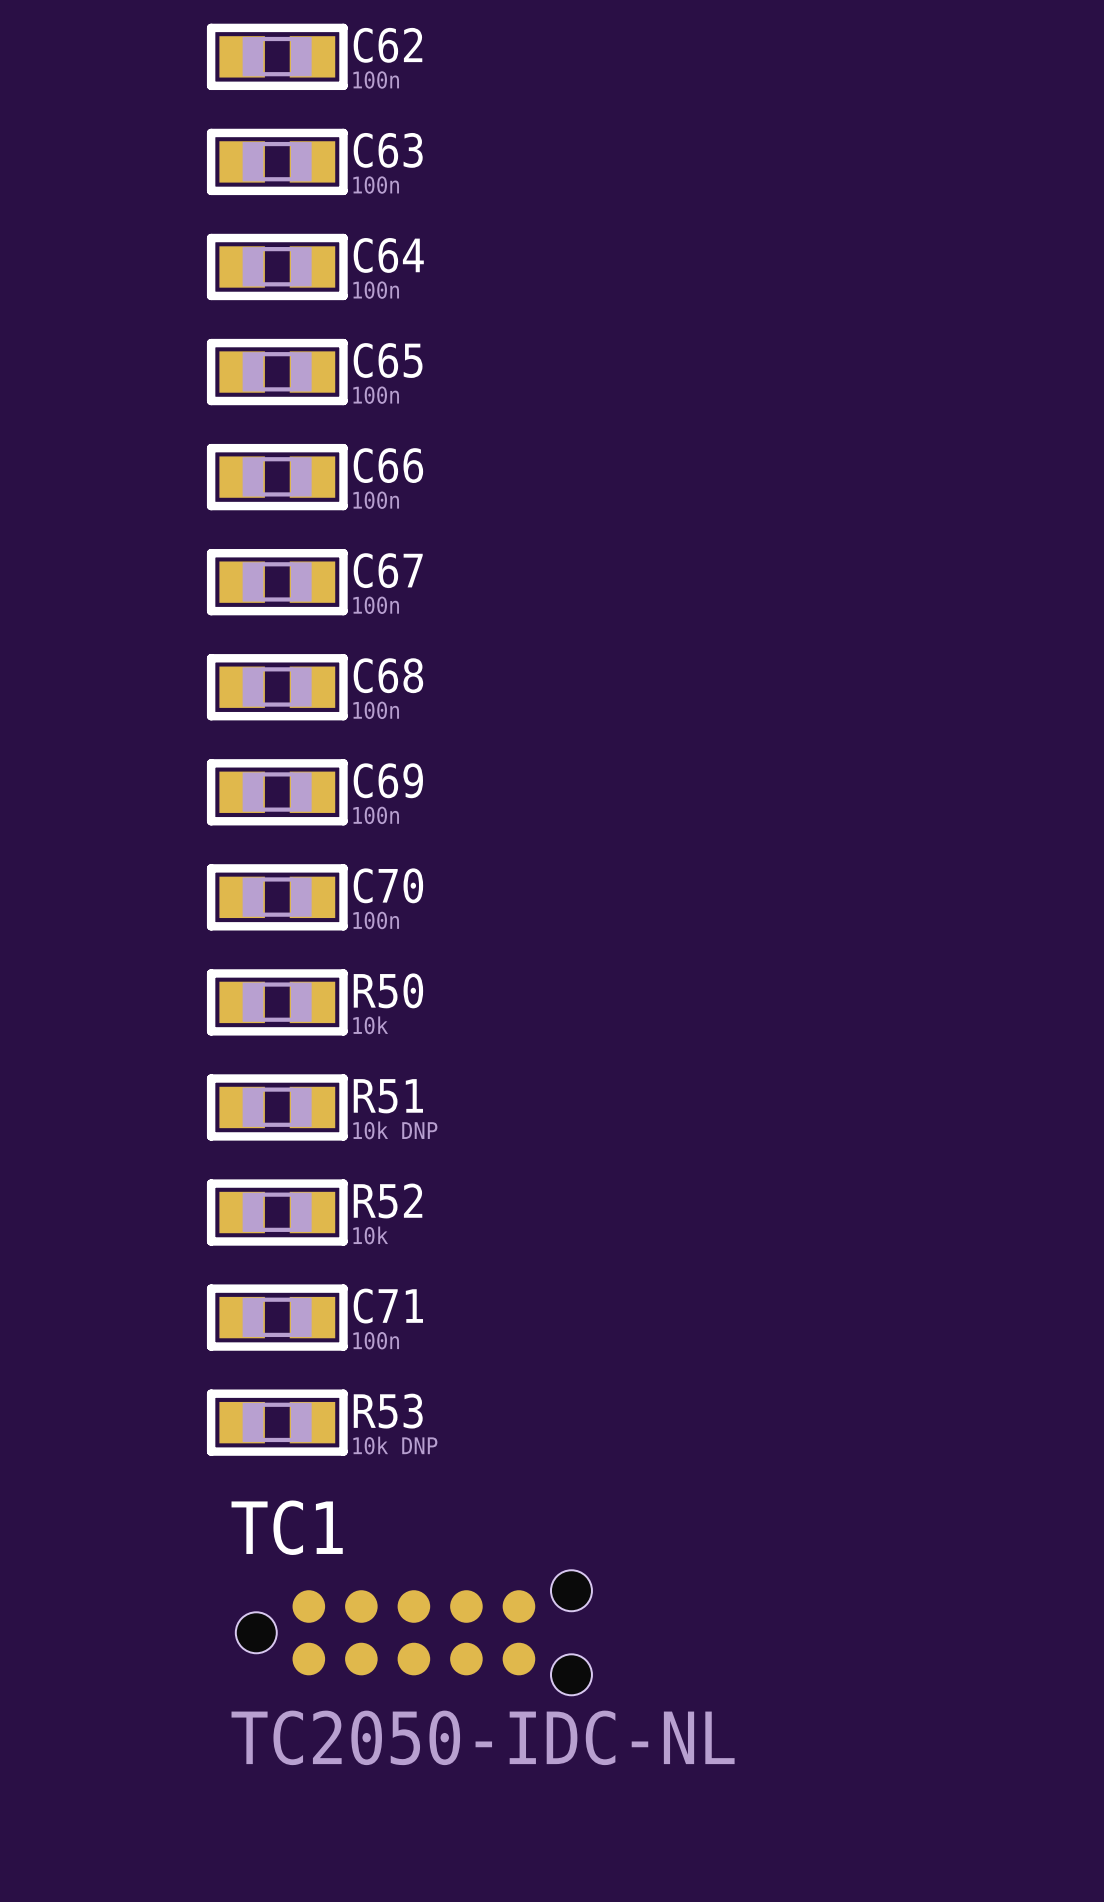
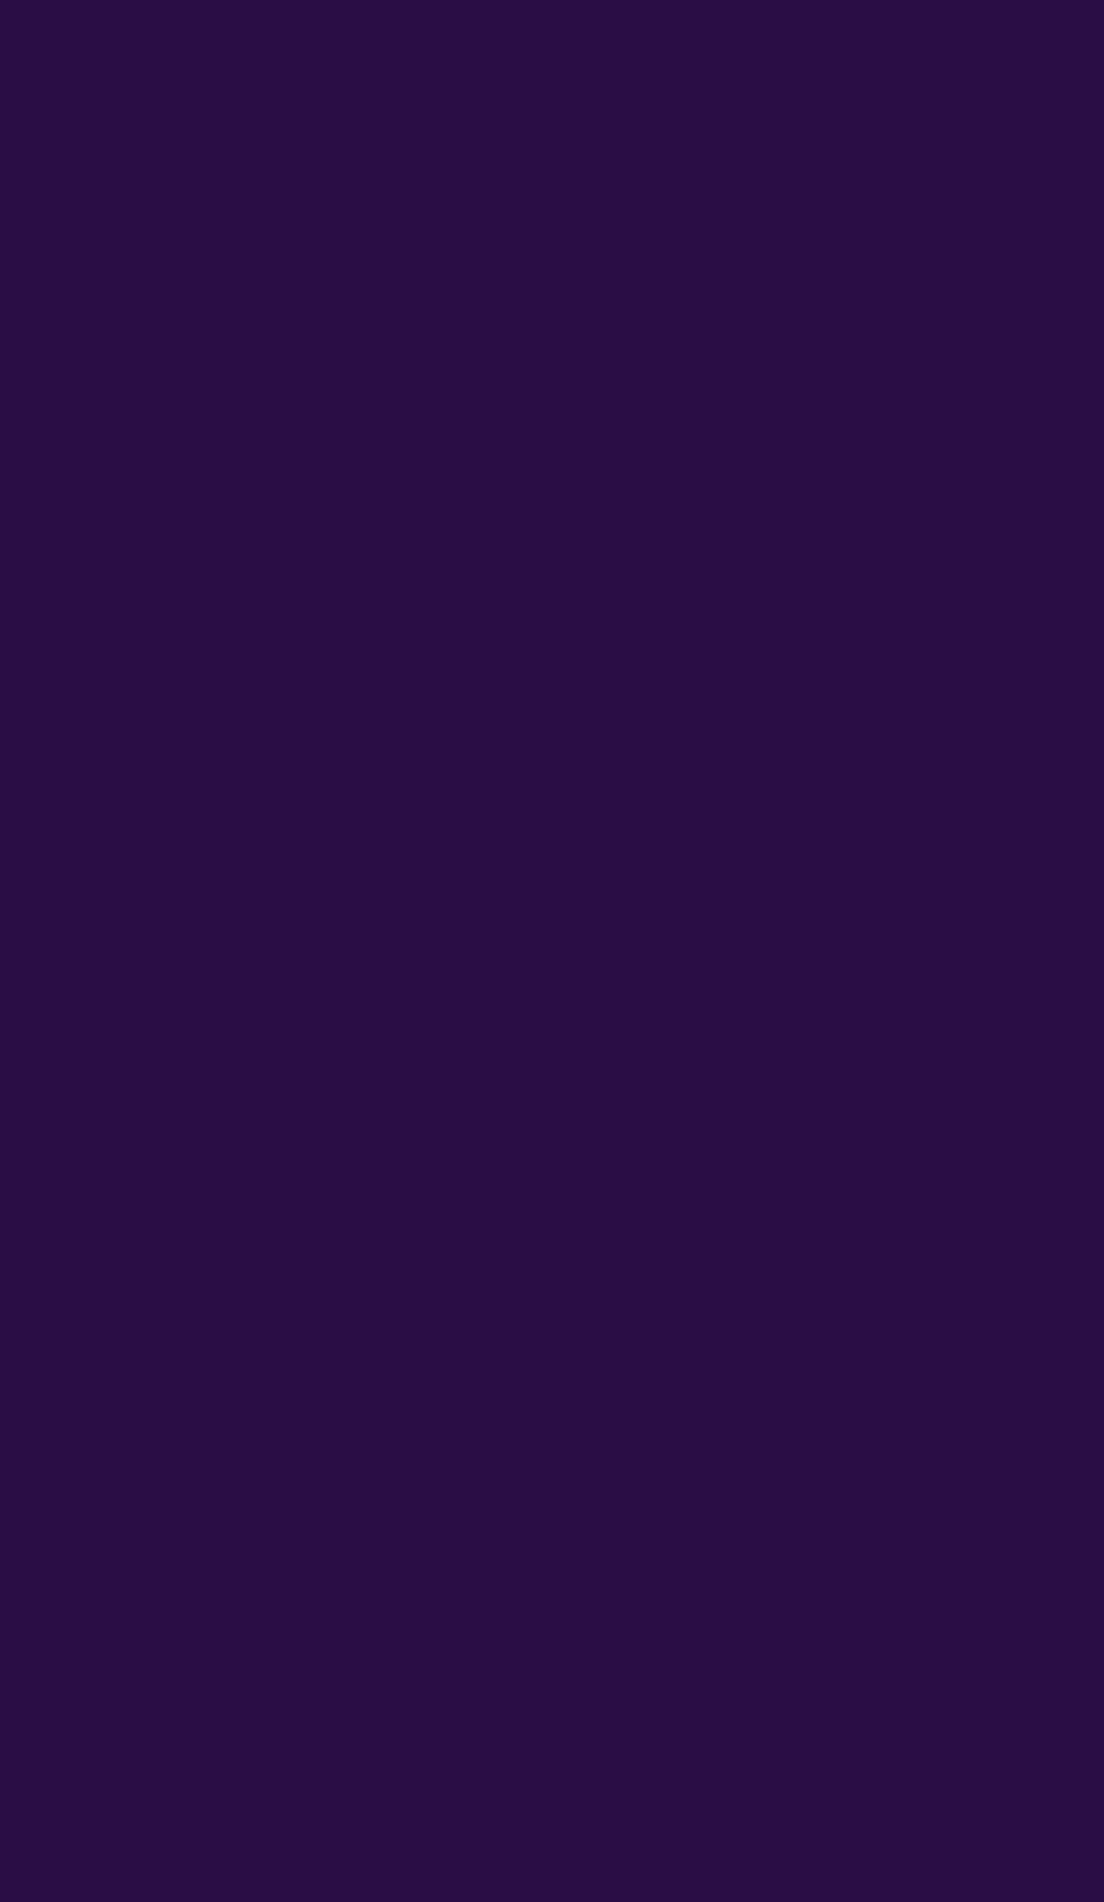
C62: 100n (277, 56) -> none
C63: 100n (277, 161) -> none
C64: 100n (277, 266) -> none
C65: 100n (277, 372) -> none
C66: 100n (277, 477) -> none
C67: 100n (277, 582) -> none
C68: 100n (277, 687) -> none
C69: 100n (277, 792) -> none
C70: 100n (277, 897) -> none
R50: 10k (277, 1002) -> none
R51: 10k DNP (277, 1107) -> none
R52: 10k (277, 1212) -> none
C71: 100n (277, 1317) -> none
R53: 10k DNP (277, 1422) -> none
TC1: TC2050-IDC-NL (413, 1632) -> none

